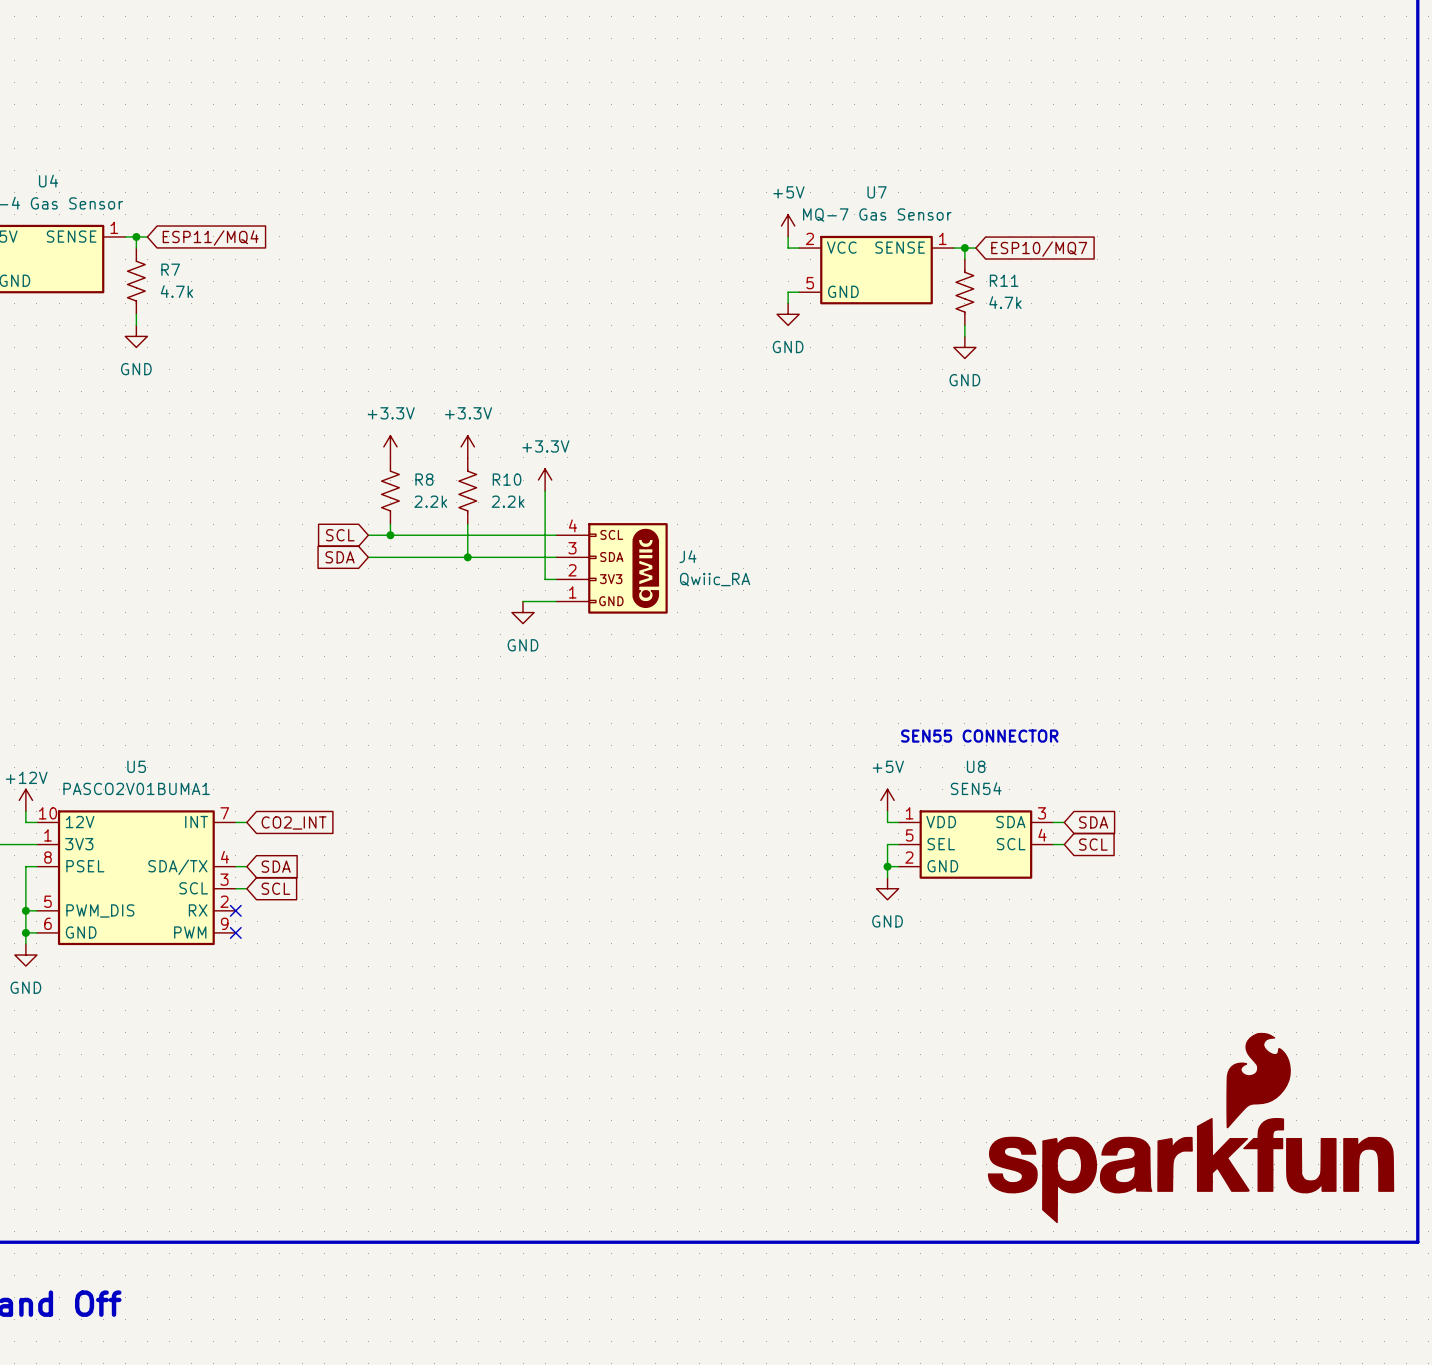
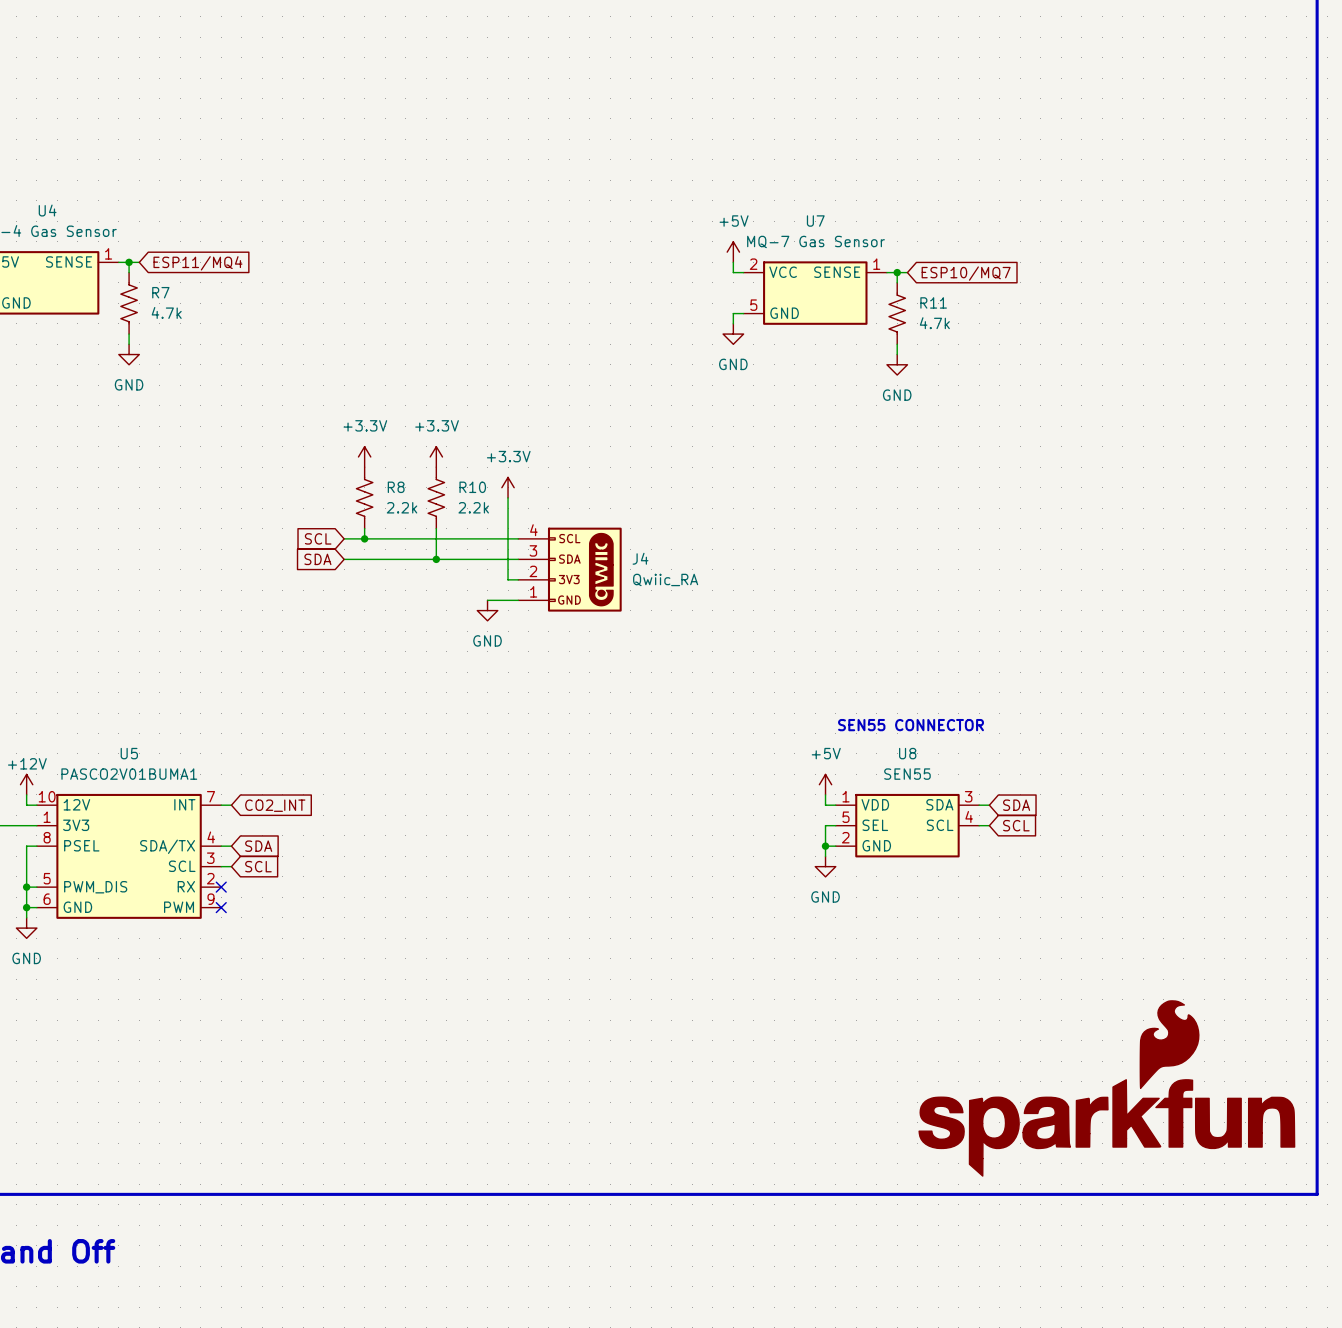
U8 value: SEN54 (976, 788) -> SEN55 (907, 774)

